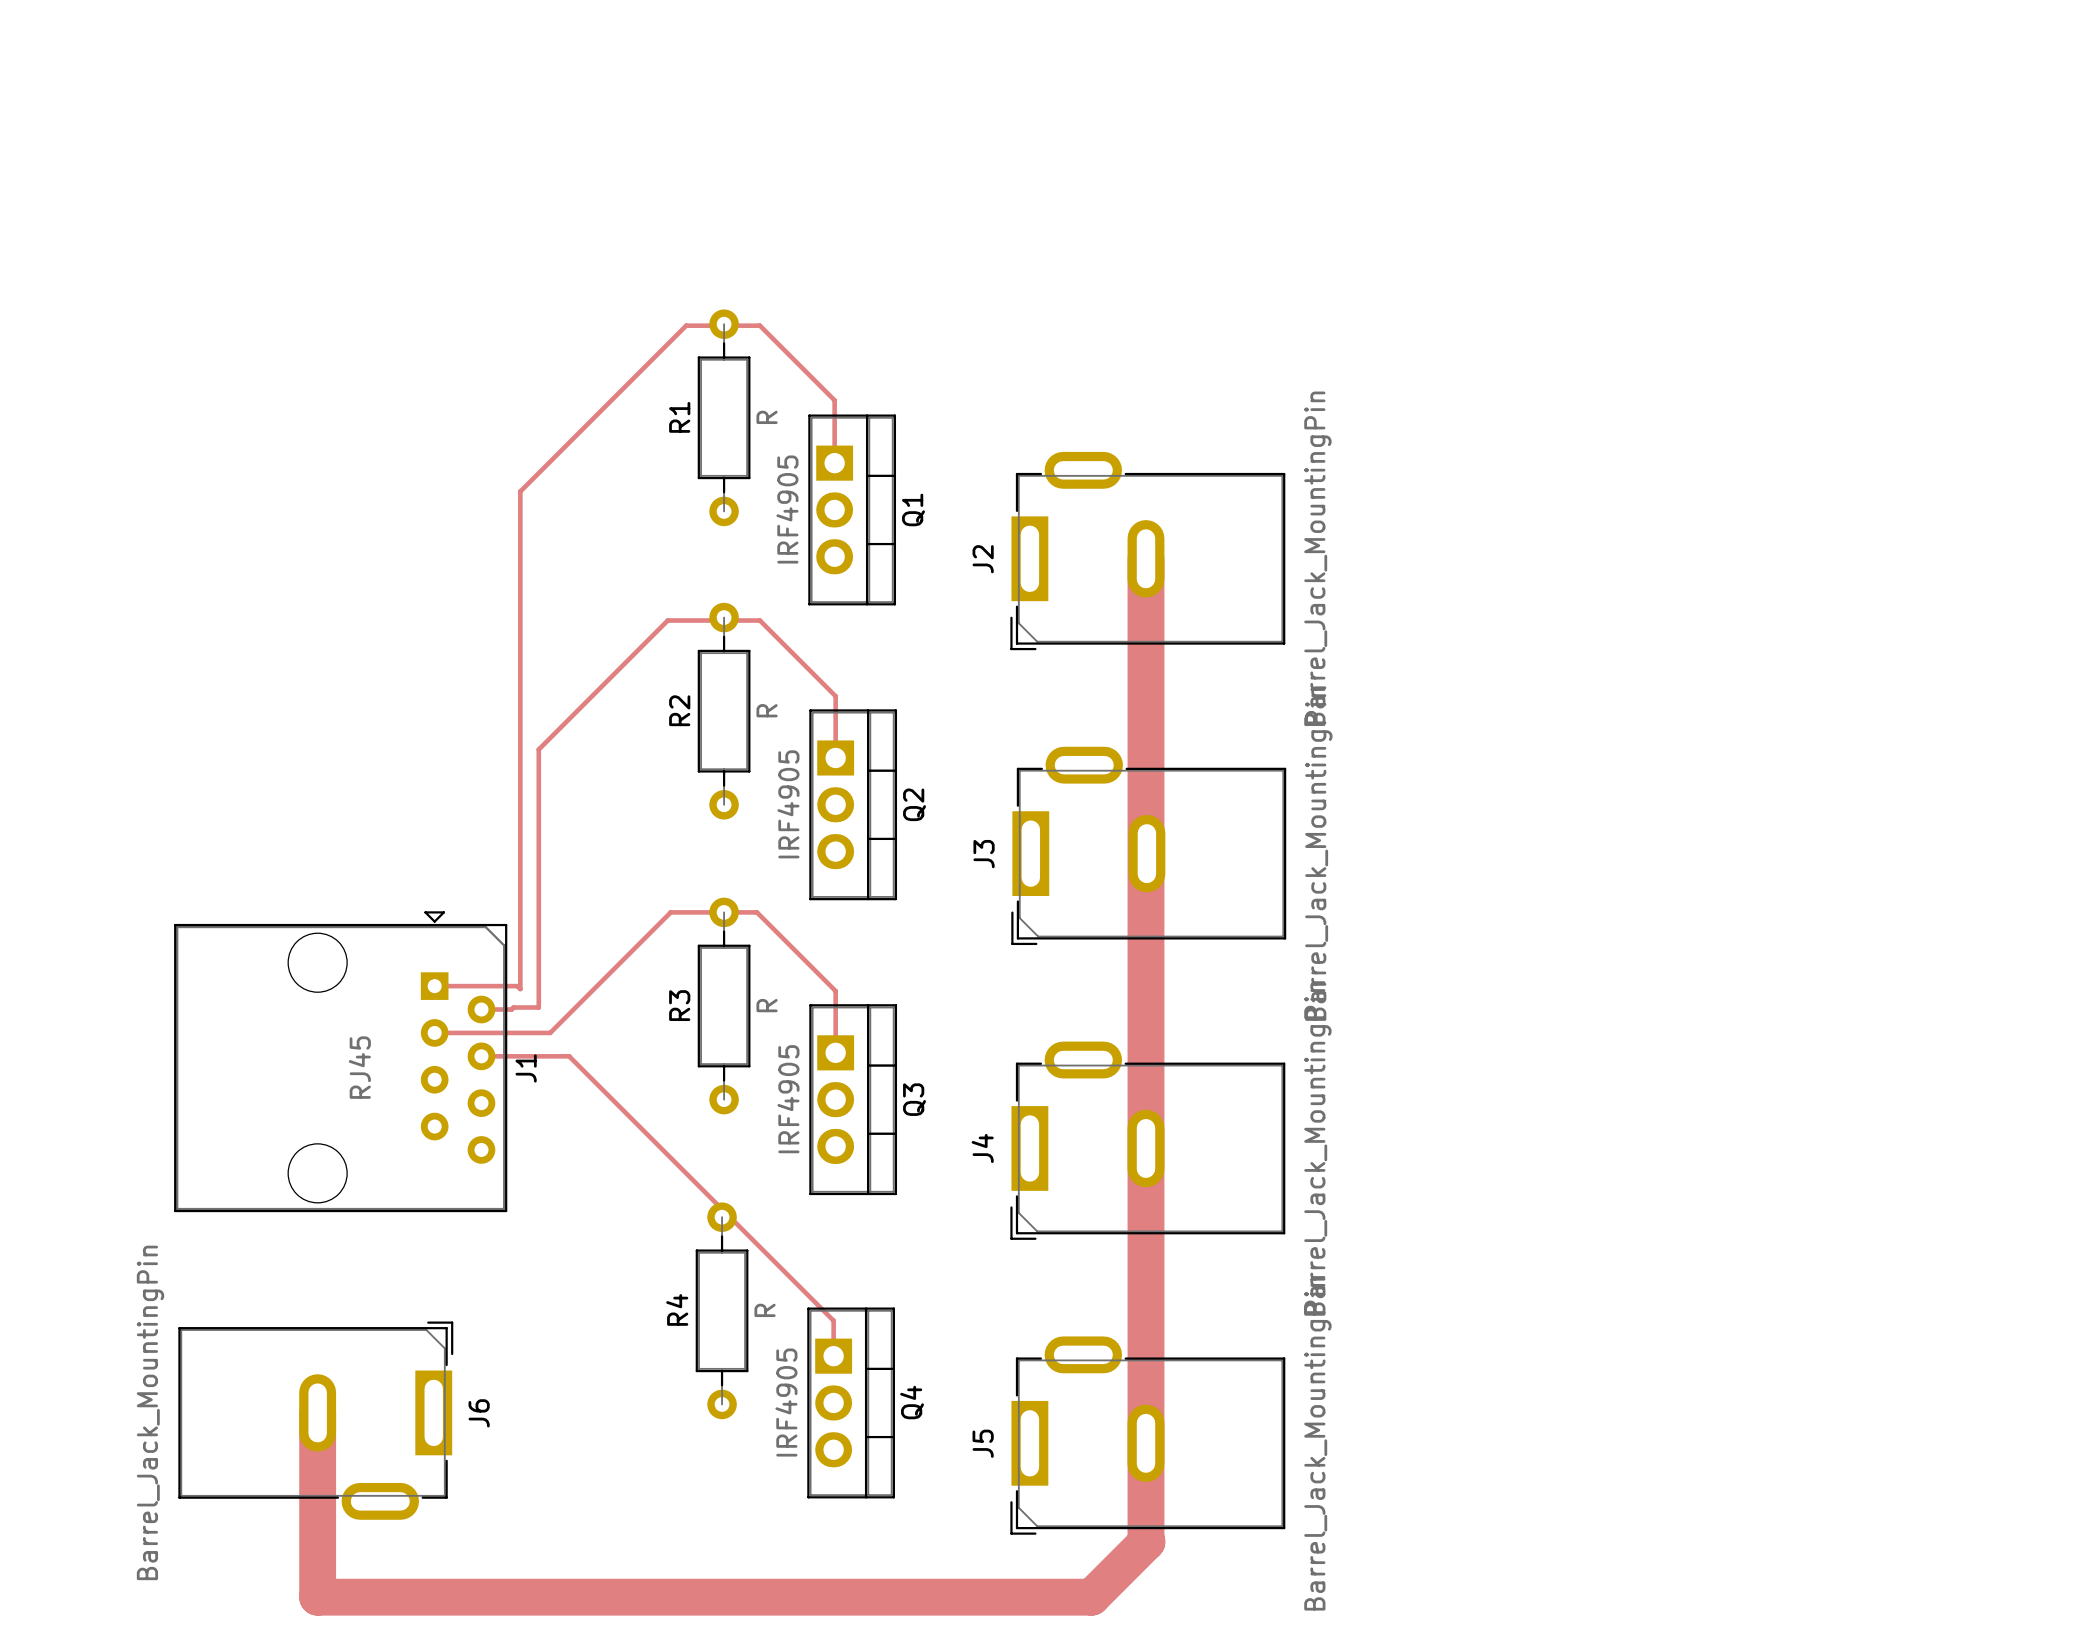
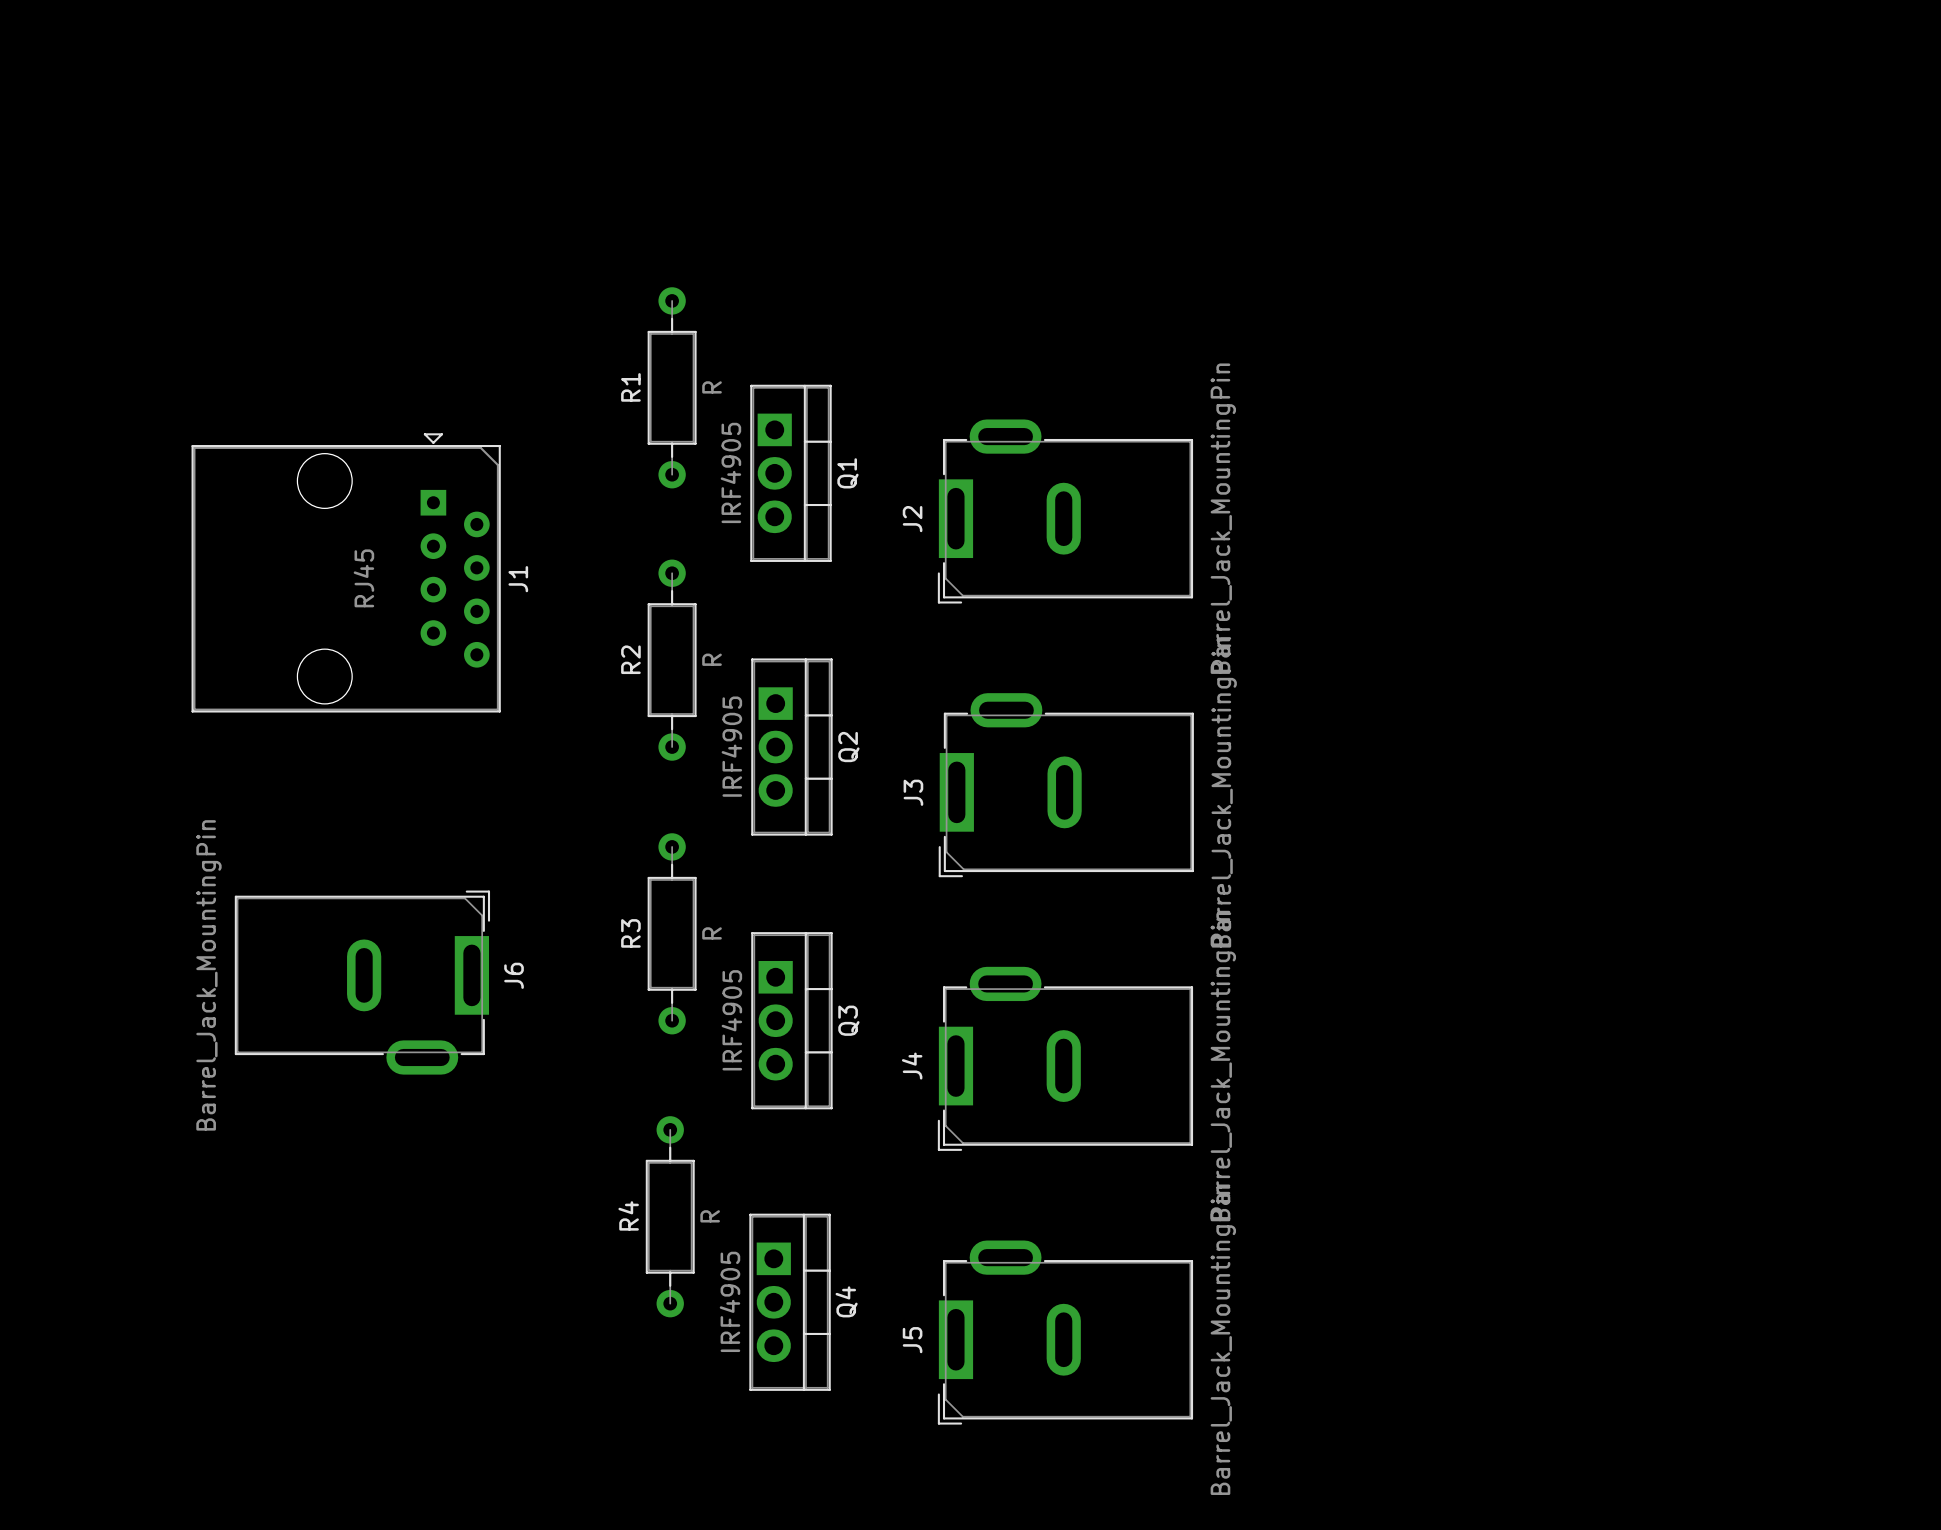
track: (834, 463) (834, 400) (759, 325) (686, 325) (520, 491) (520, 989) (517, 986) (434, 986) -> none
track: (1145, 558) (1146, 1541) (1091, 1597) (317, 1597) (317, 1412) -> none
track: (835, 757) (835, 696) (759, 620) (667, 620) (538, 749) (538, 1007) (481, 1009) -> none
track: (434, 1032) (550, 1032) (670, 912) (756, 912) (835, 991) (835, 1052) -> none
track: (481, 1056) (569, 1056) (833, 1320) (833, 1356) -> none
J1 position: (340, 1061) -> (346, 572)
J6 position: (315, 1420) -> (362, 982)

